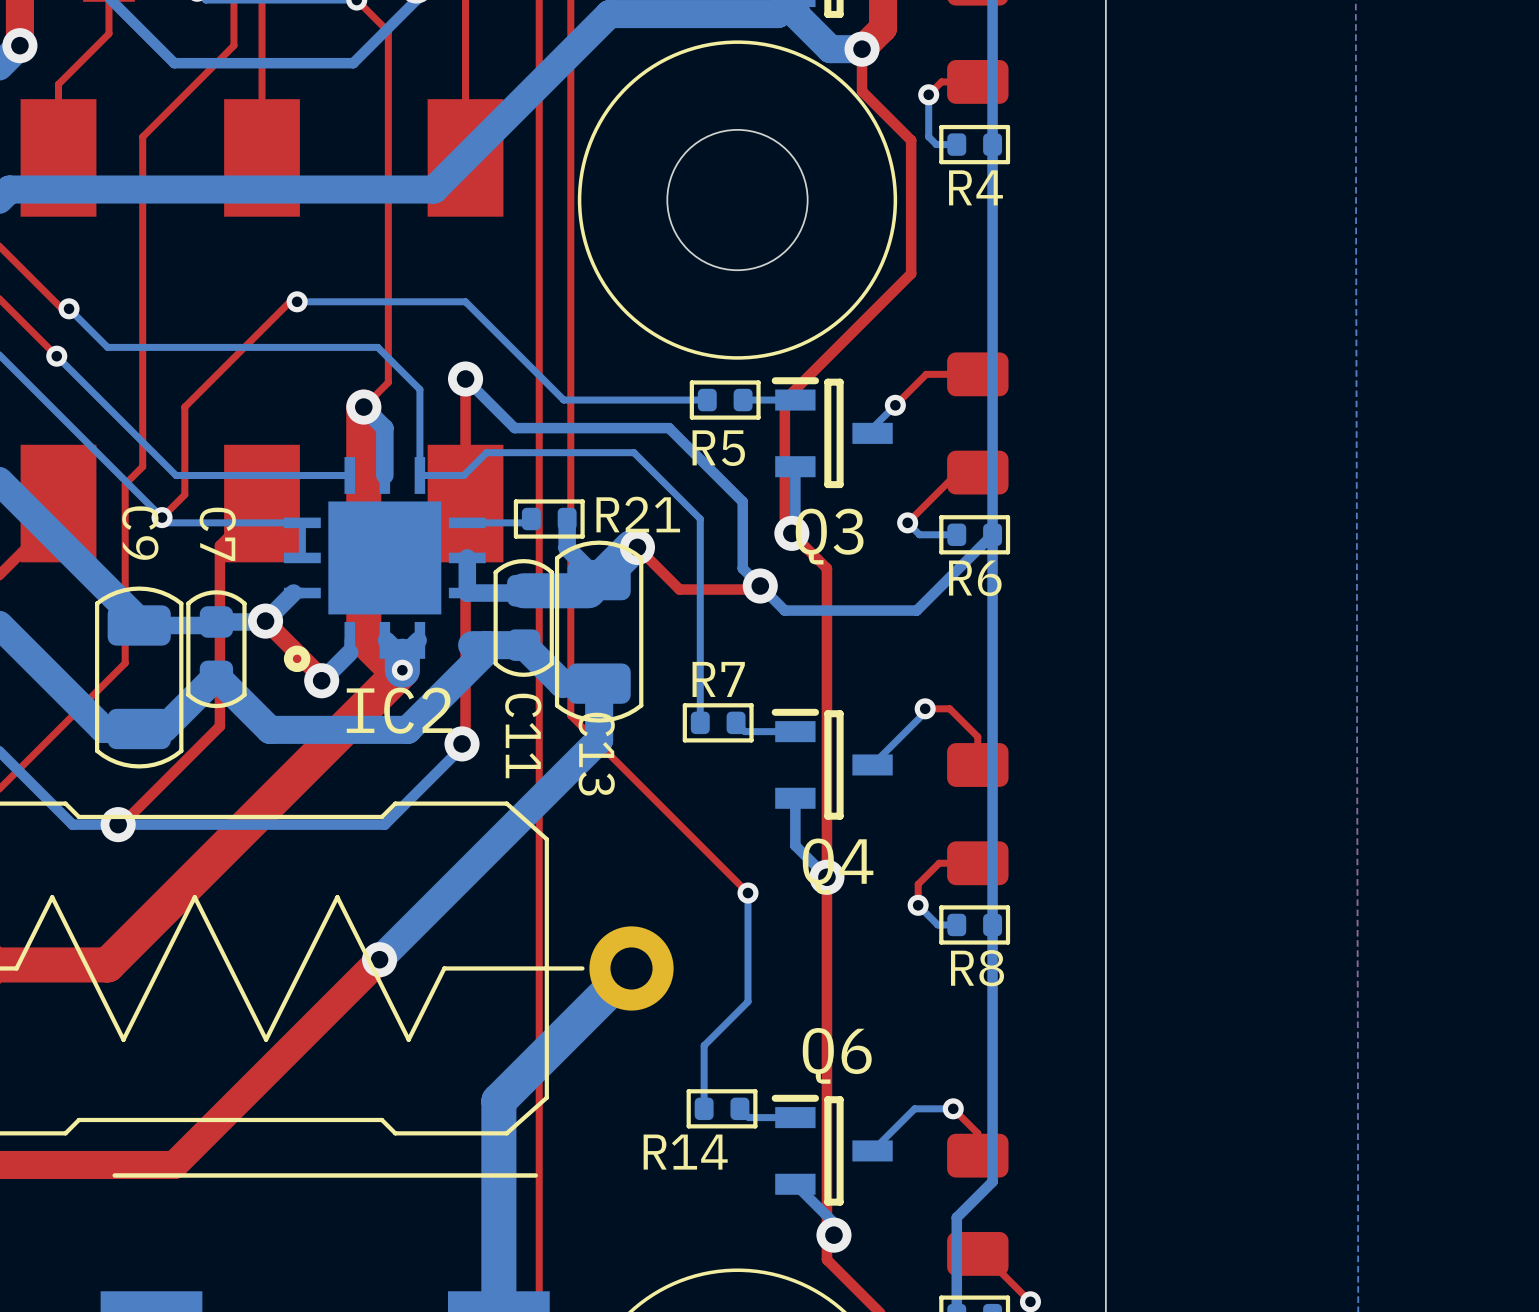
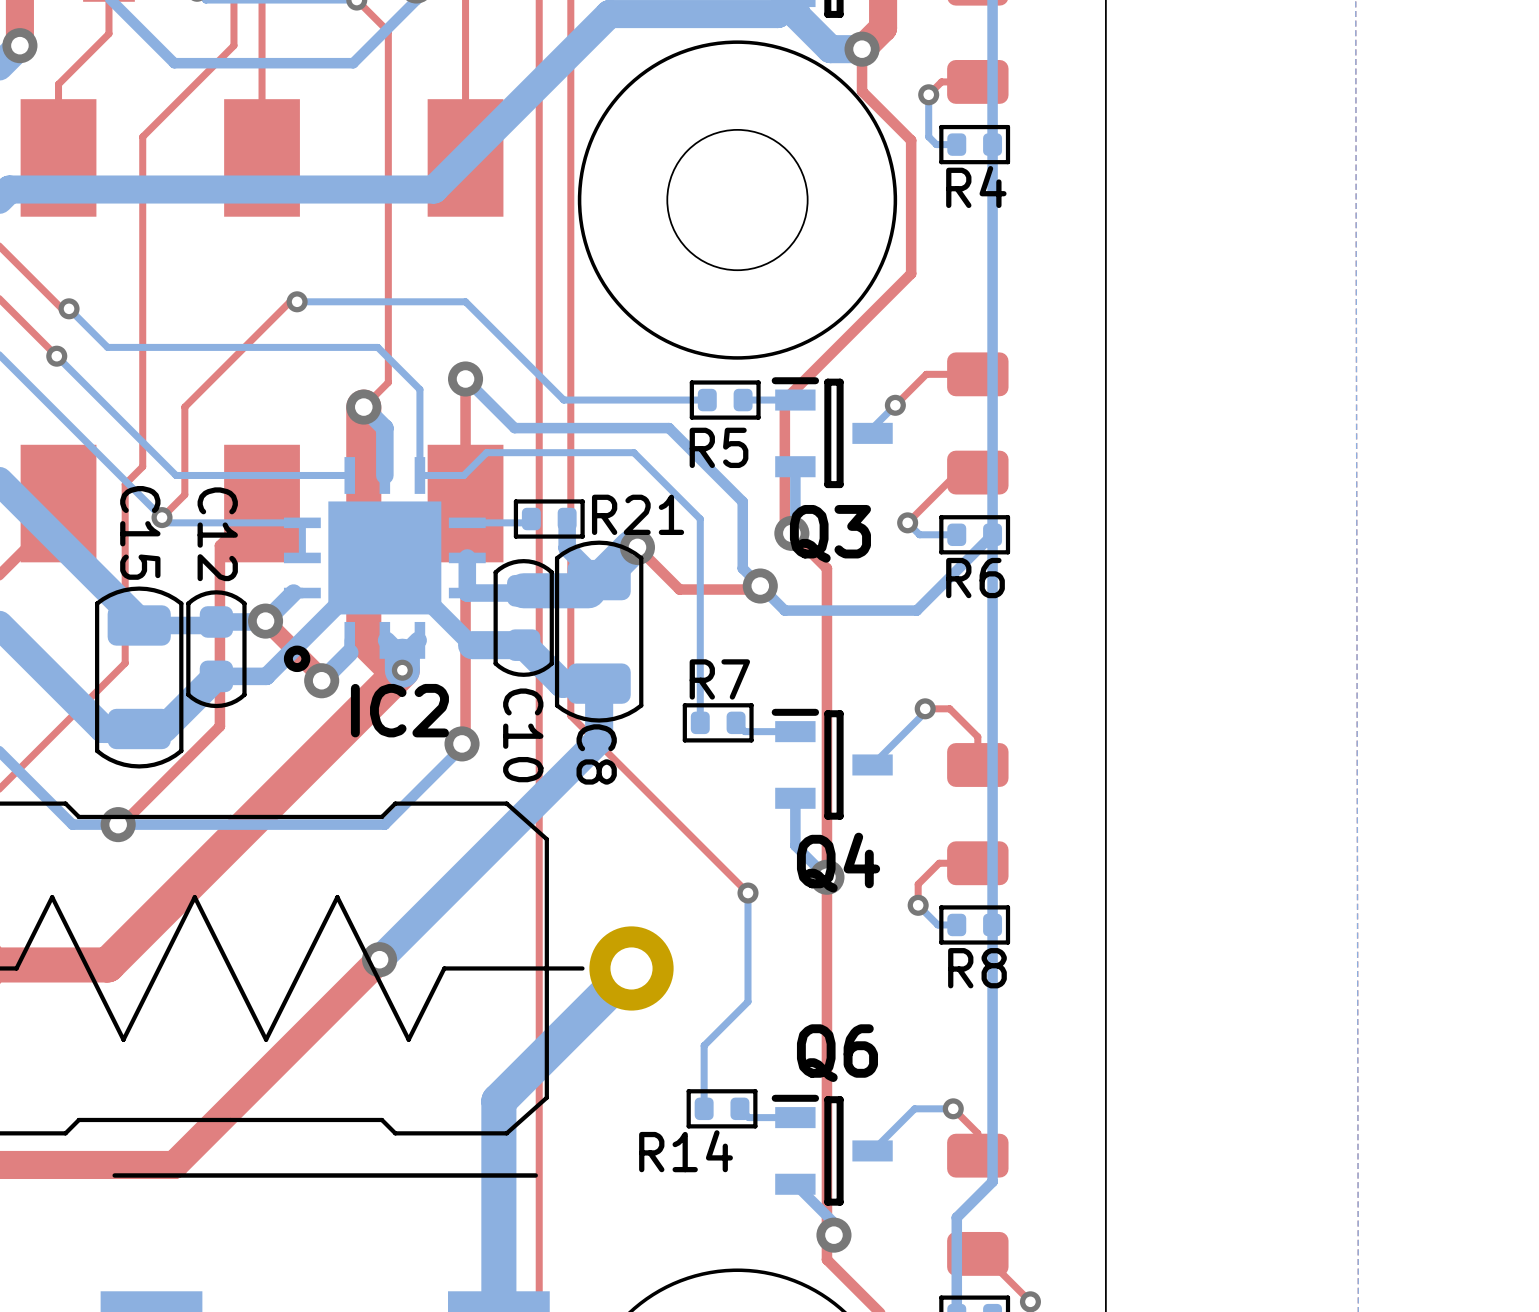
C9 name: C9 (140, 533) -> C15 (140, 532)
C7 name: C7 (217, 534) -> C12 (217, 534)
bottom track: (486, 645) (486, 650) (407, 729) (269, 729) (216, 676) -> (472, 645) (384, 557) (266, 676) (216, 676)
C11 name: C11 (523, 735) -> C10 (523, 735)
C13 name: C13 (596, 754) -> C8 (596, 754)

